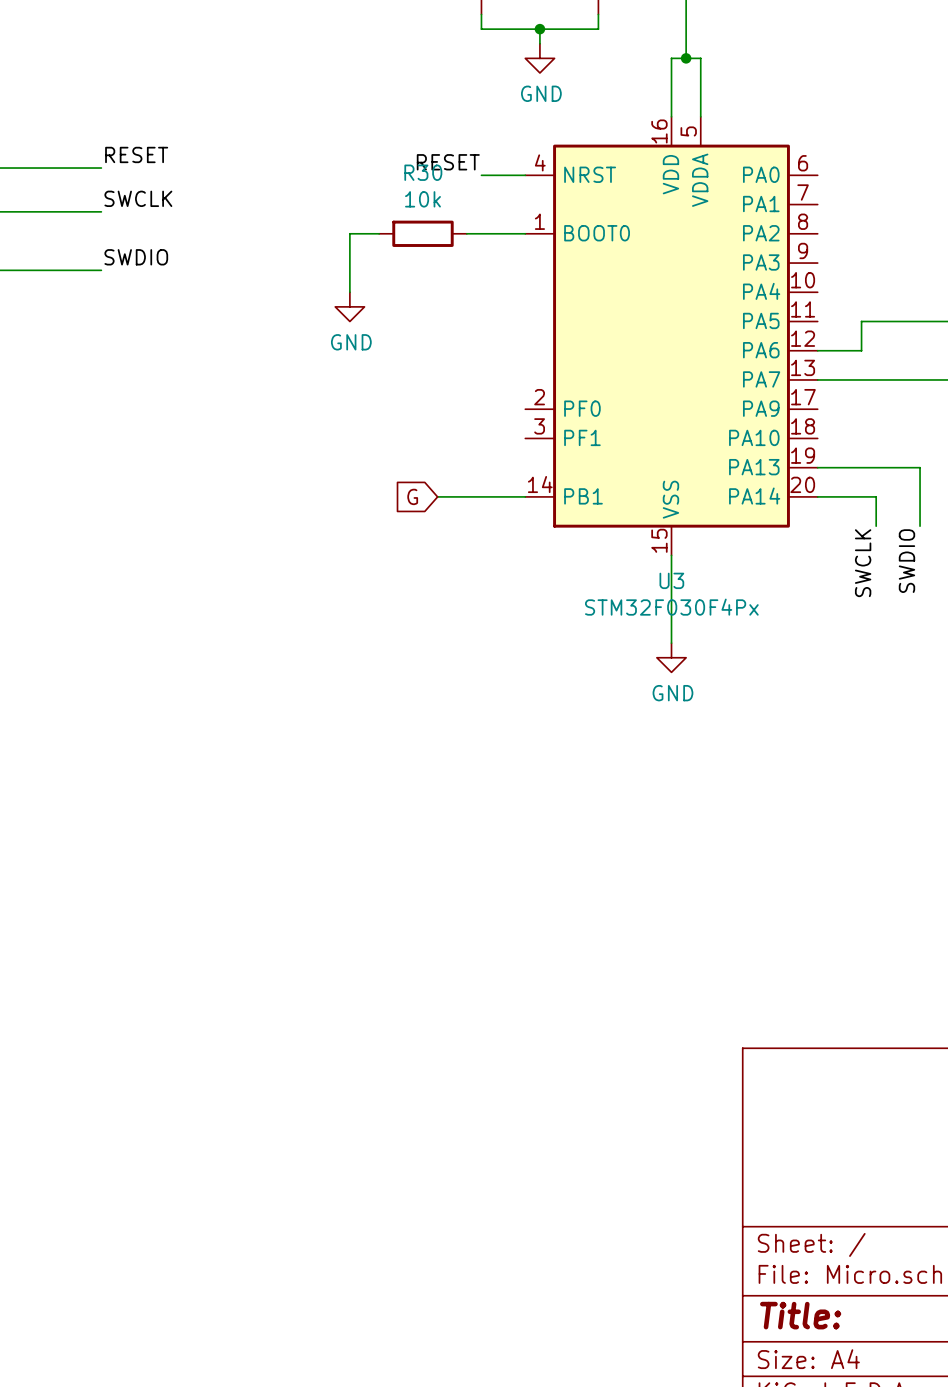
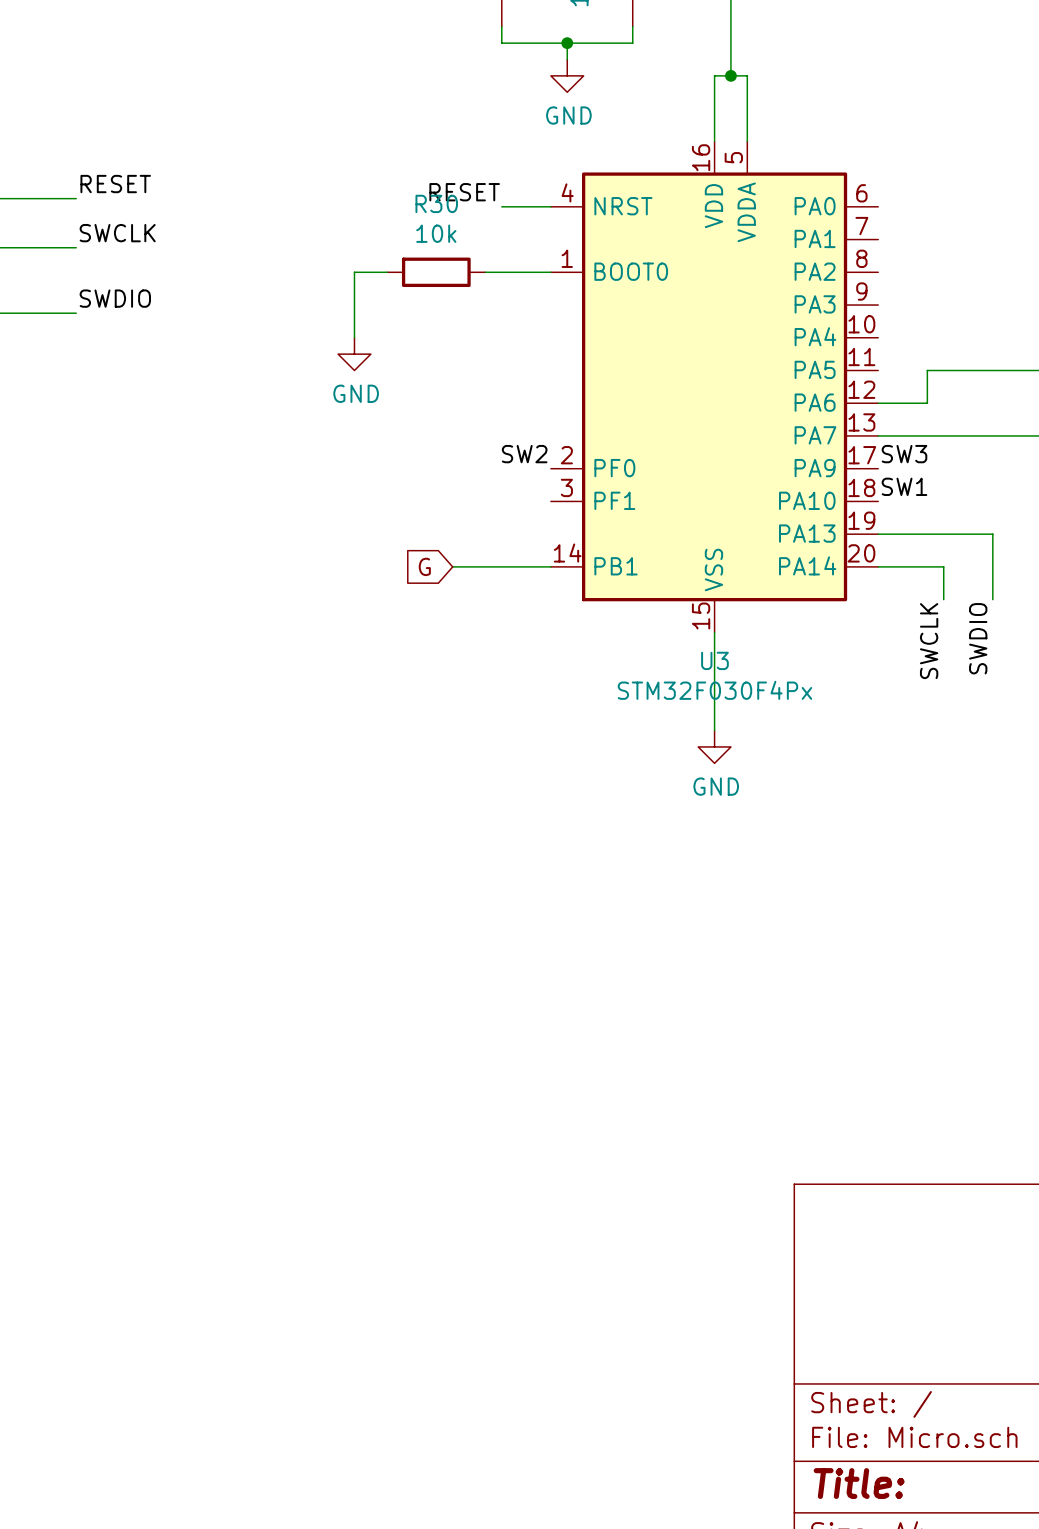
label: none -> SW2 (524, 454)
label: none -> SW3 (904, 454)
label: none -> SW1 (904, 486)

